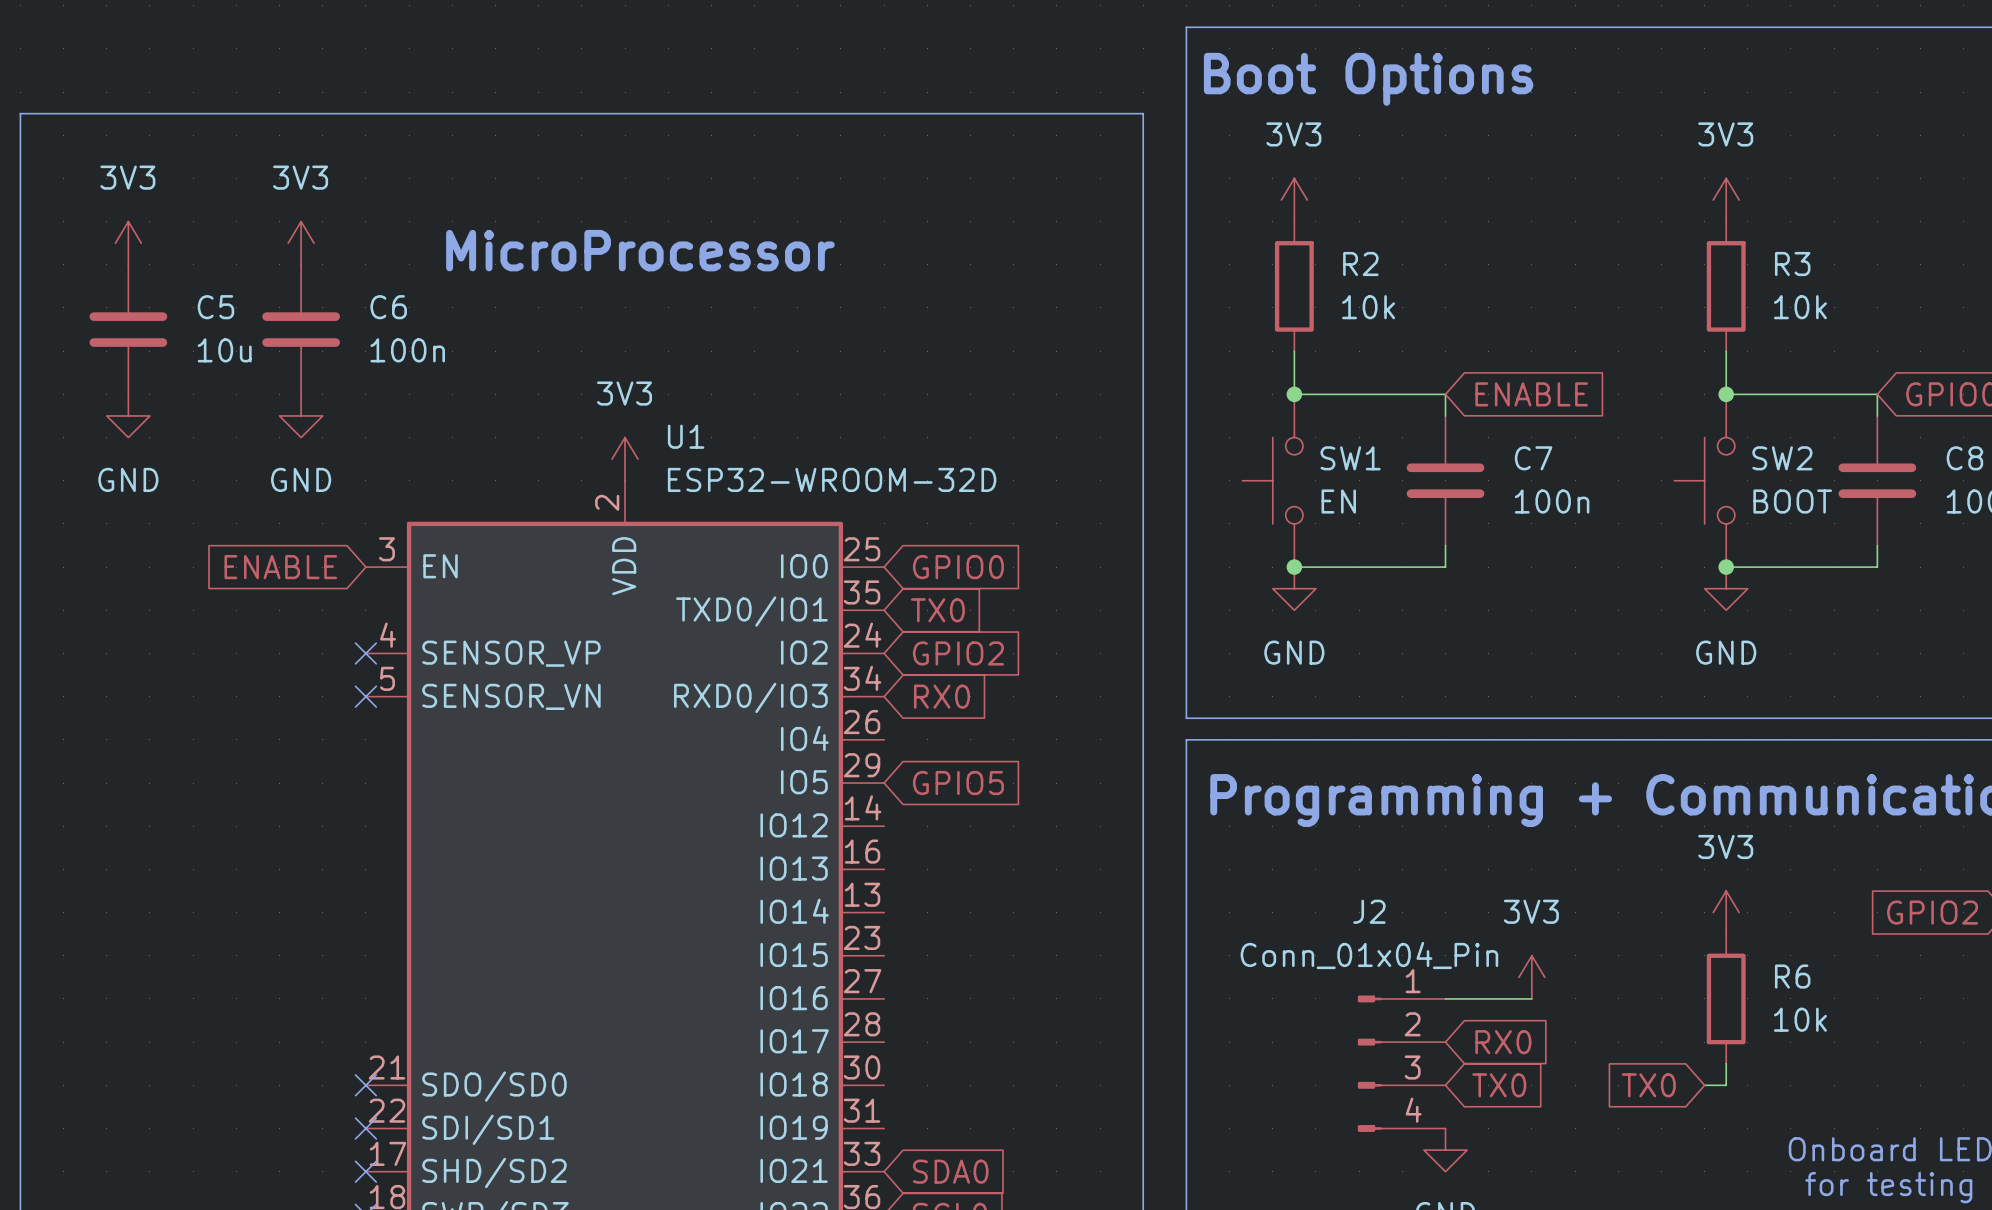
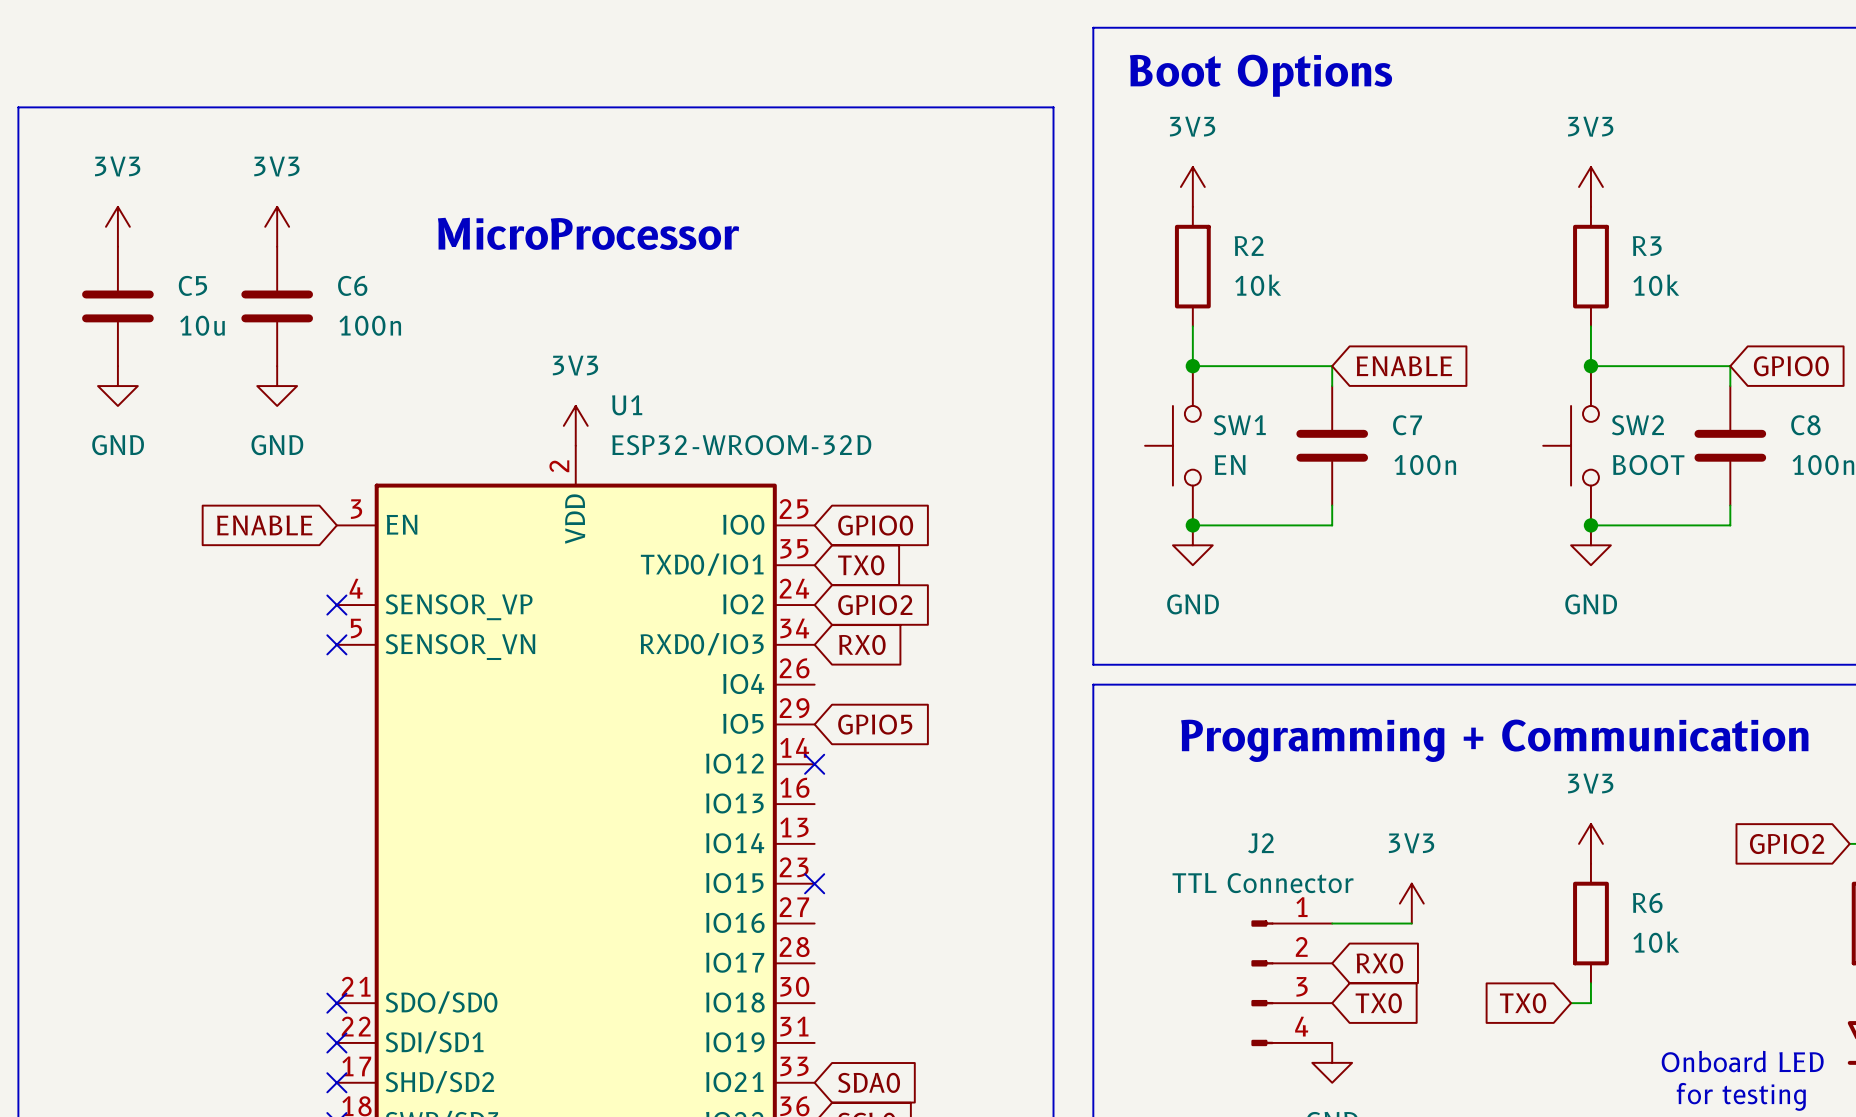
no-connect mark: none -> (814, 764)
no-connect mark: none -> (814, 883)
J2 value: Conn_01x04_Pin (1369, 955) -> TTL Connector (1263, 883)

